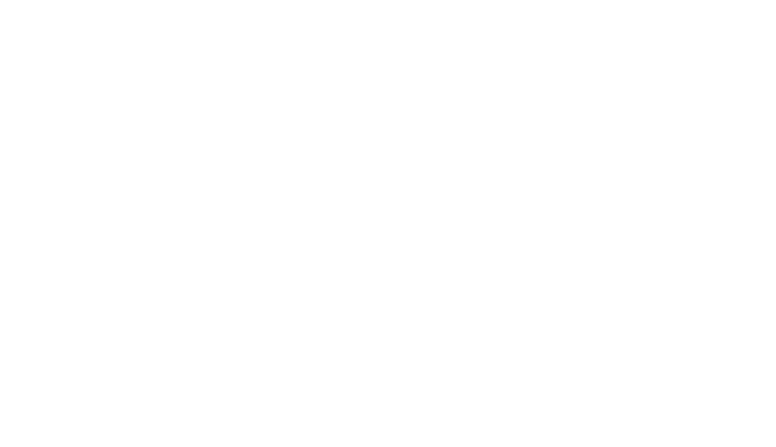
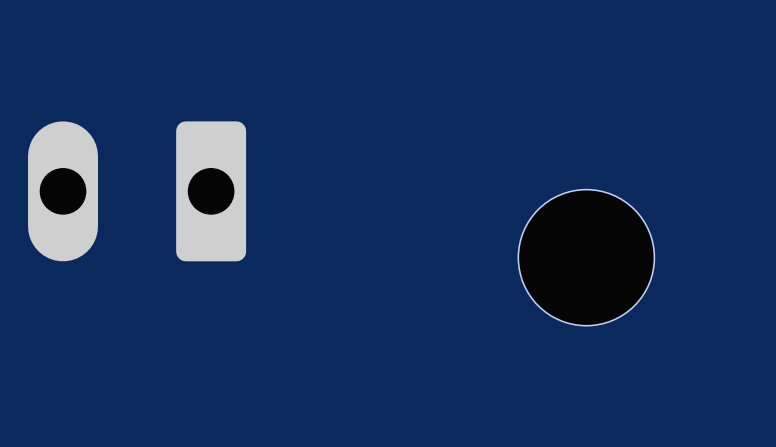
part: none -> (137, 191)
part: none -> (586, 257)

